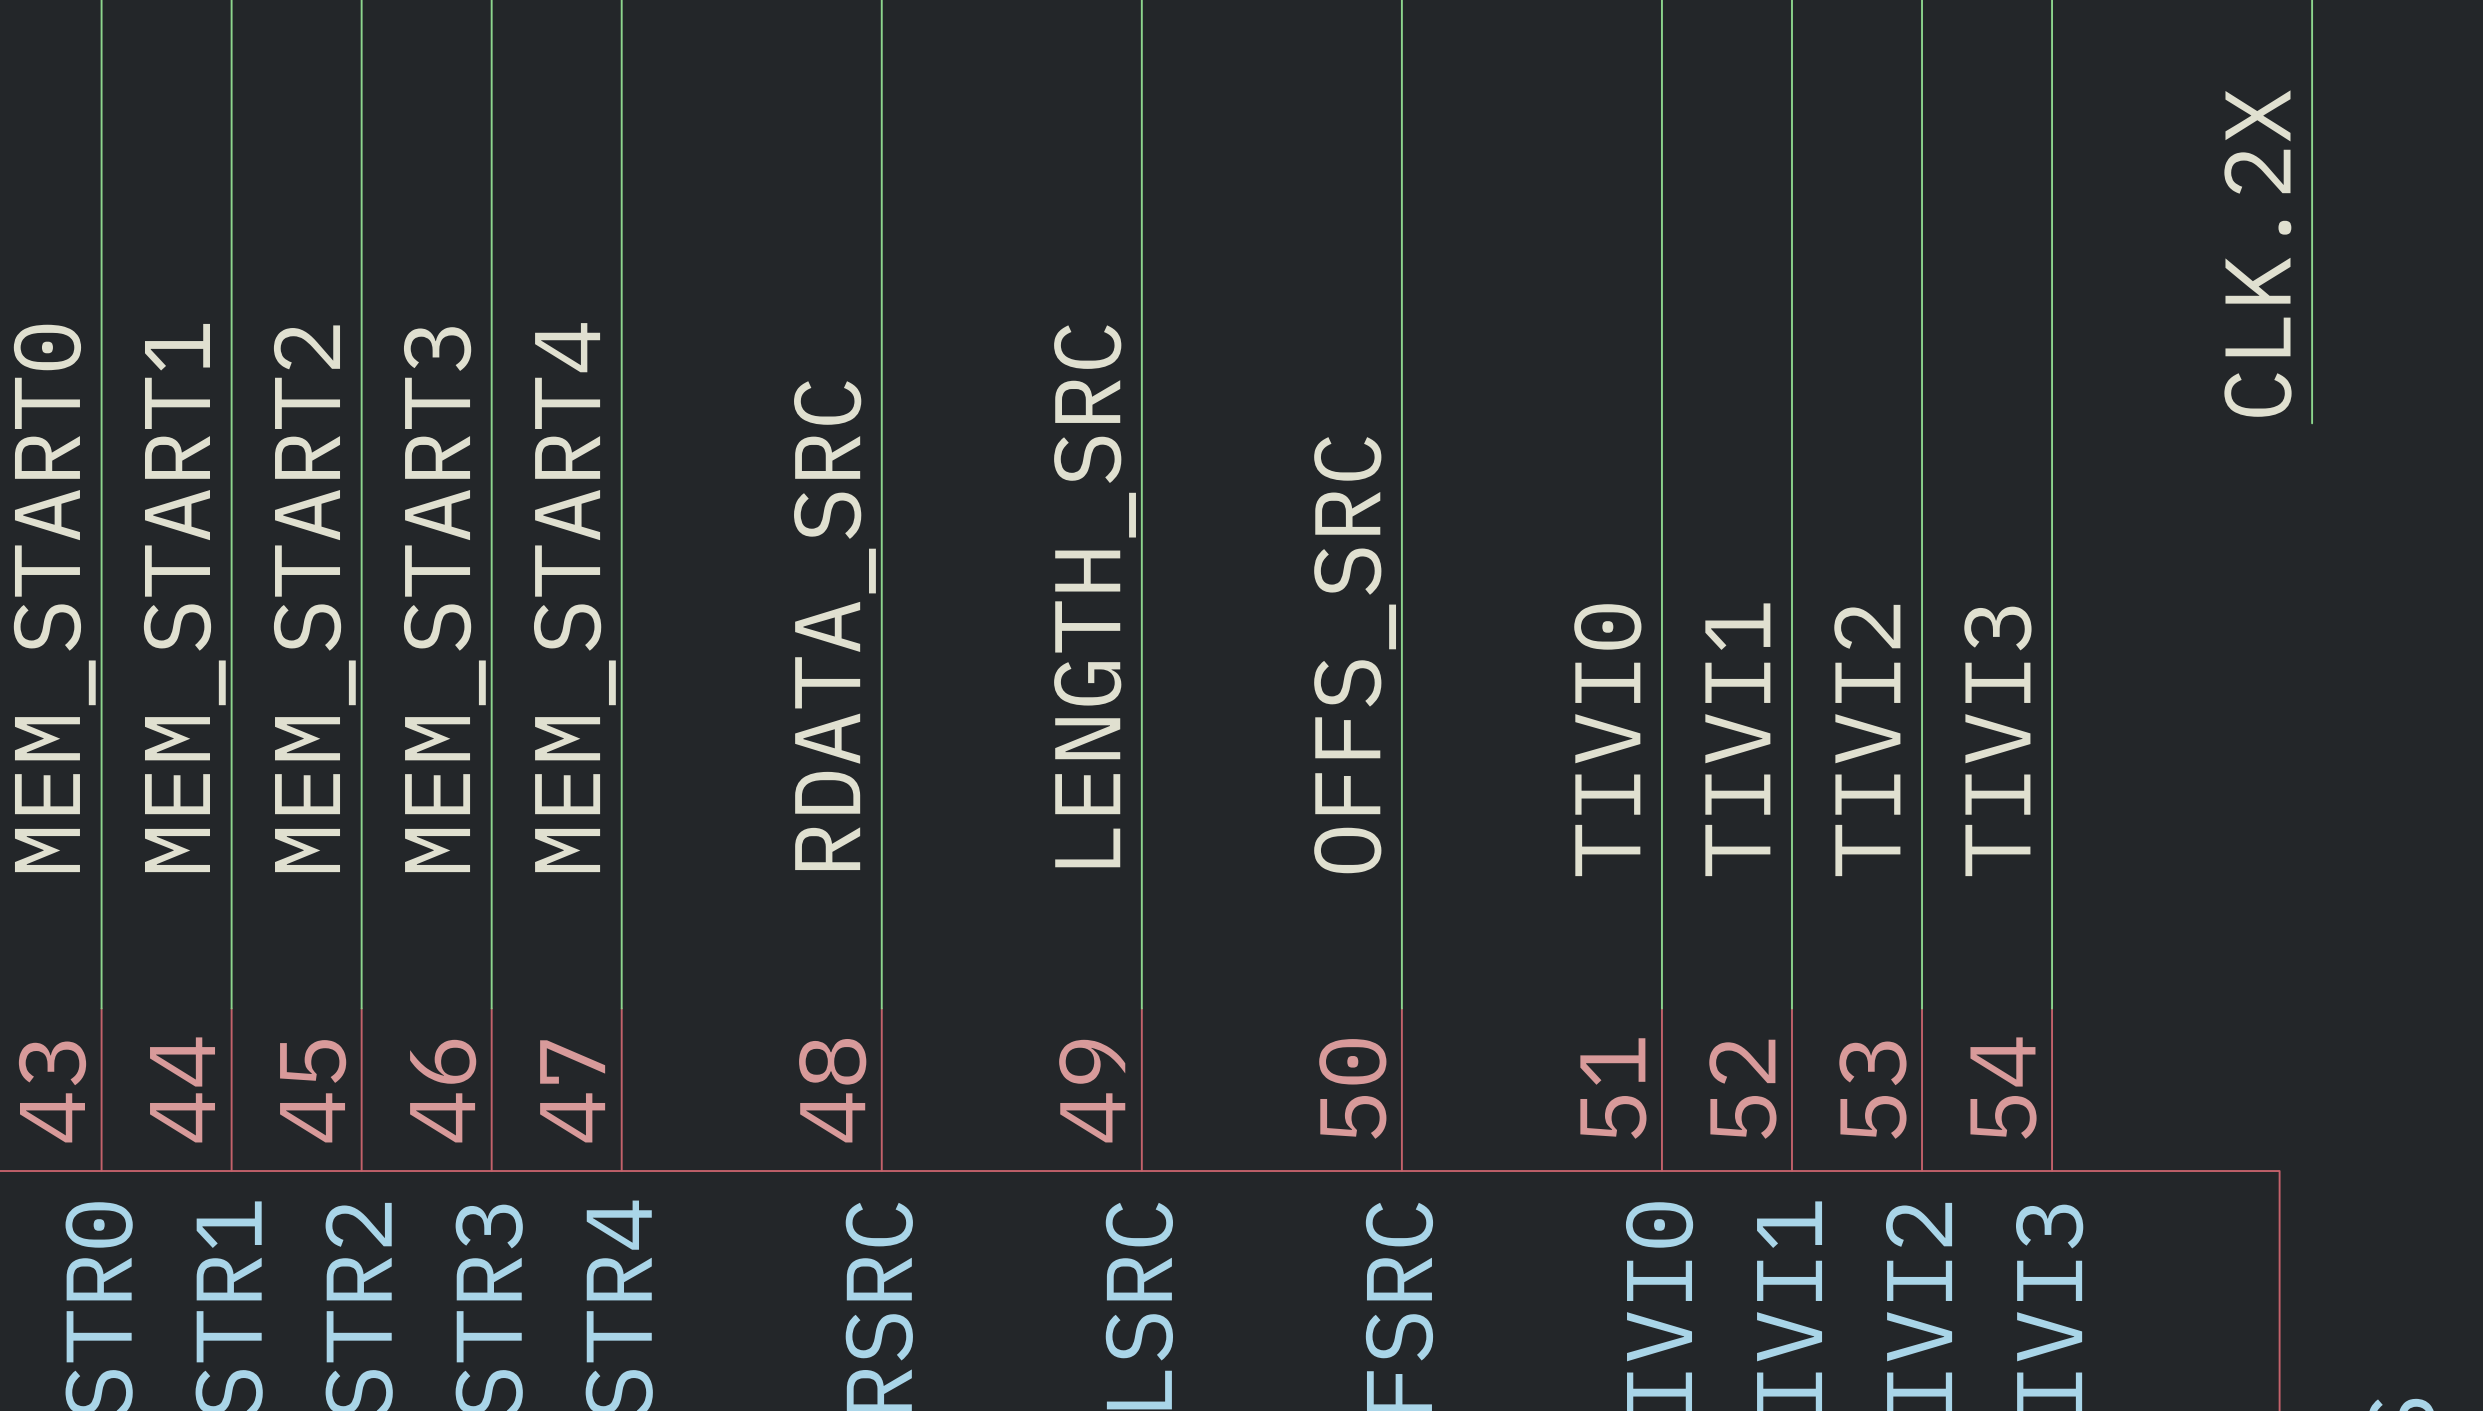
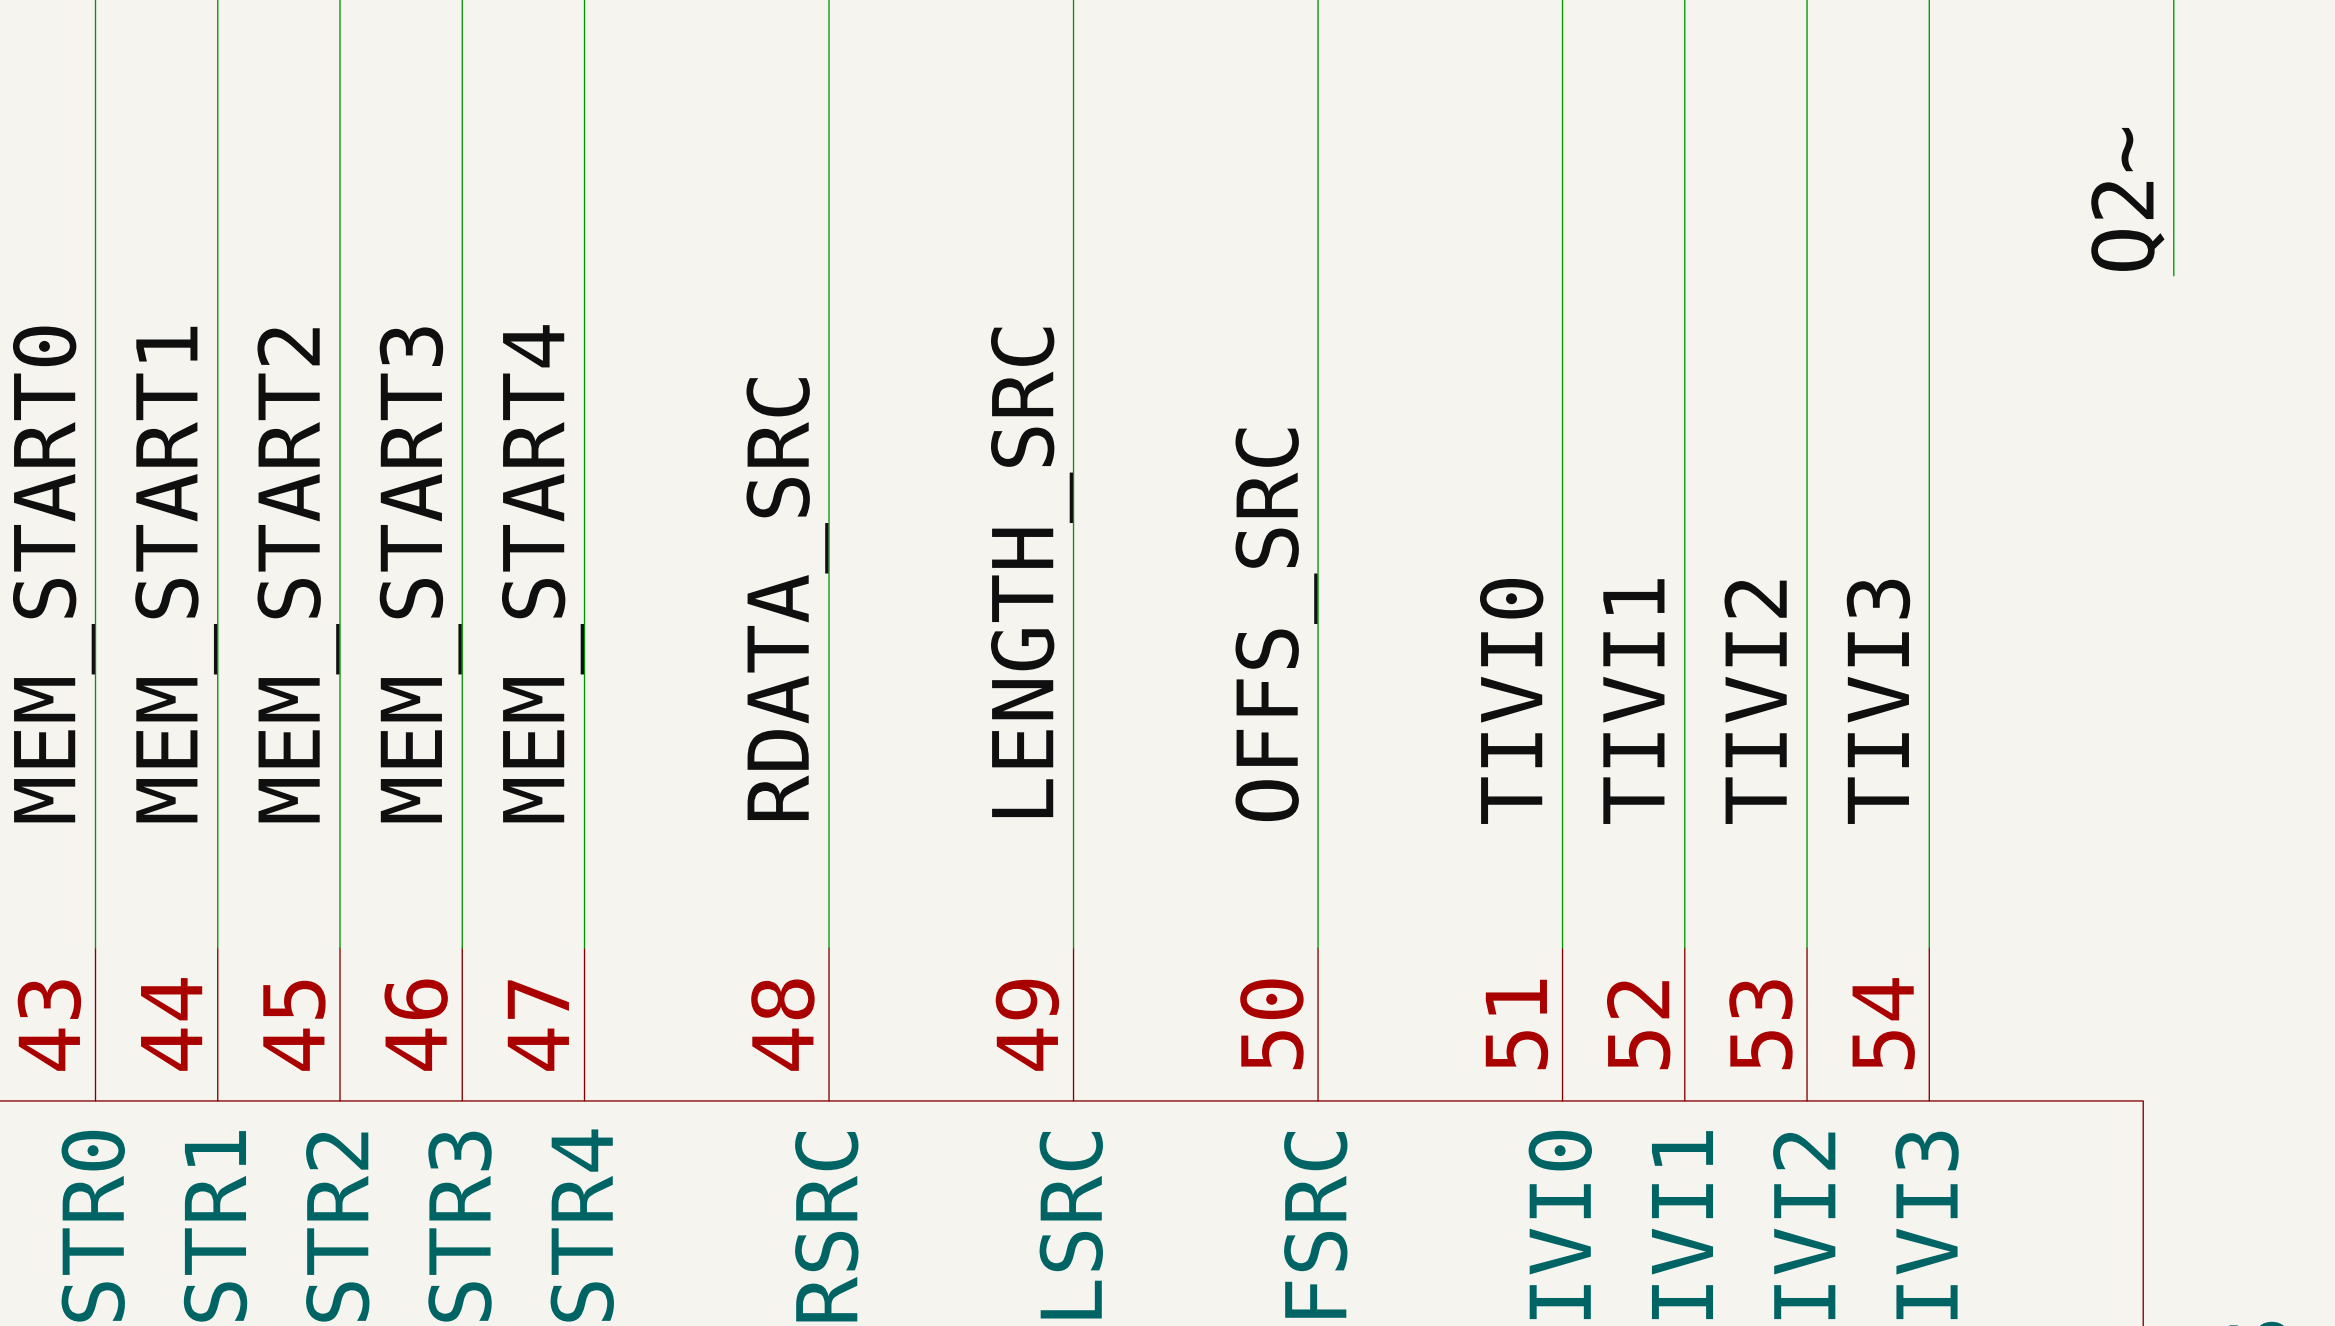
label: none -> Q2~ (2127, 199)
label: CLK.2X (2257, 253) -> none
wire: (2312, 293) (2312, 423) -> none

